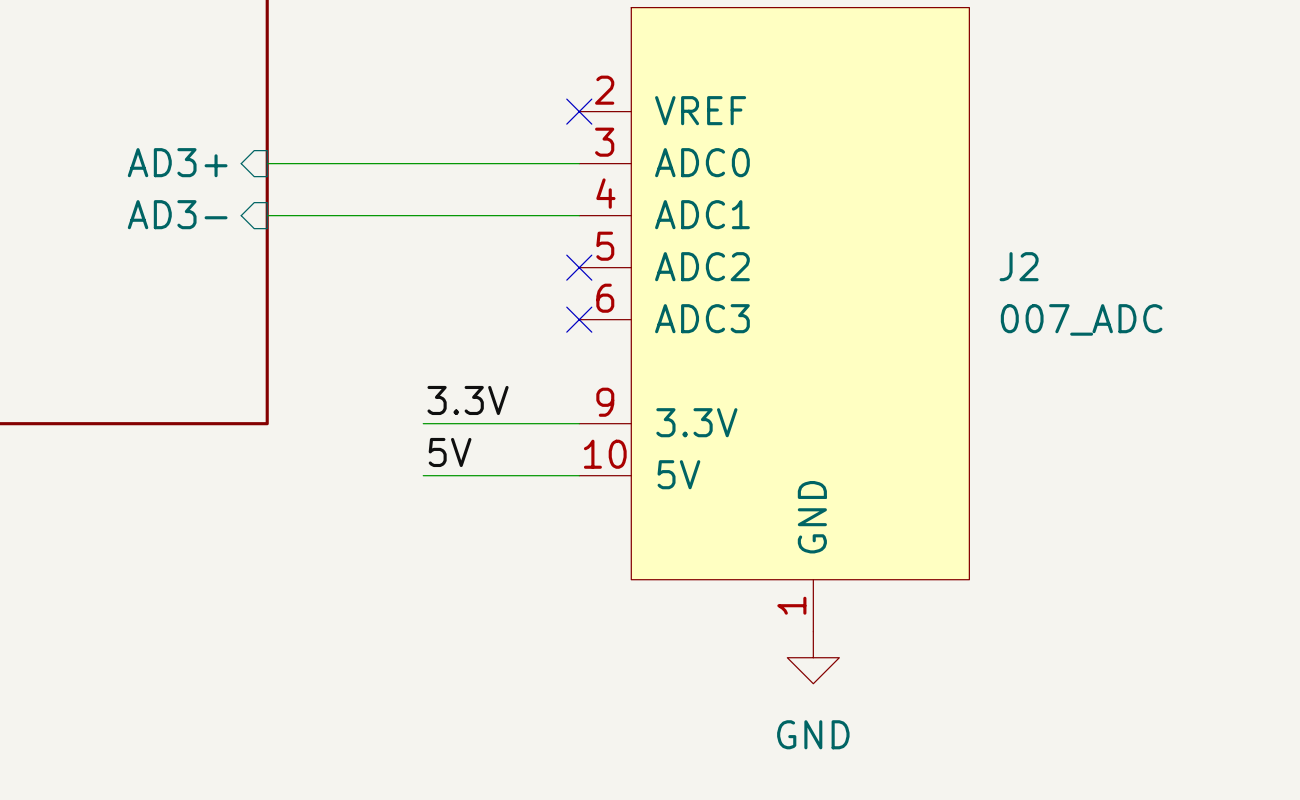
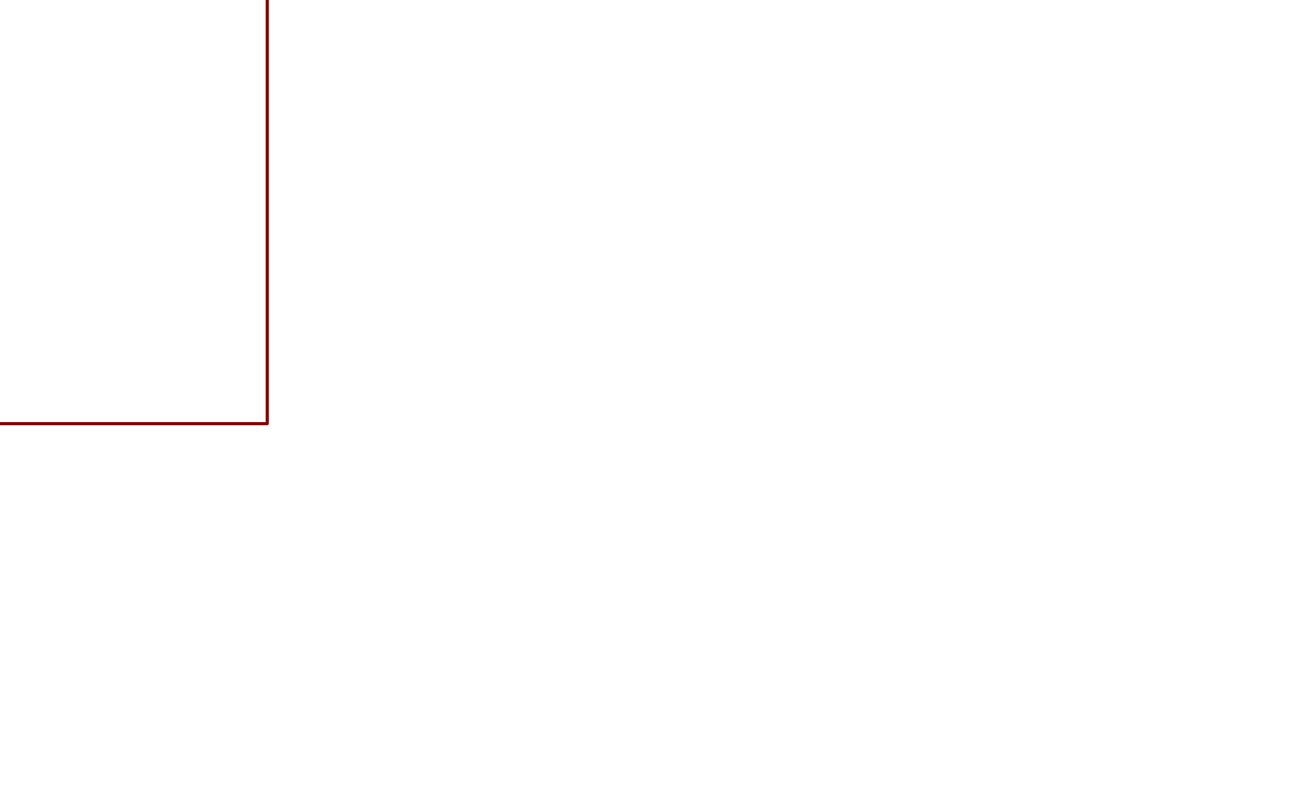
no-connect mark: (579, 111) -> none
sheet pin: AD3+ (177, 162) -> none
wire: (267, 163) (579, 163) -> none
sheet pin: AD3- (177, 214) -> none
wire: (267, 215) (579, 215) -> none
no-connect mark: (579, 267) -> none
no-connect mark: (579, 319) -> none
J2: 007_ADC (774, 319) -> none
label: 3.3V (468, 400) -> none
wire: (423, 423) (579, 423) -> none
label: 5V (450, 452) -> none
wire: (423, 475) (579, 475) -> none
power symbol: GND (813, 657) -> none

